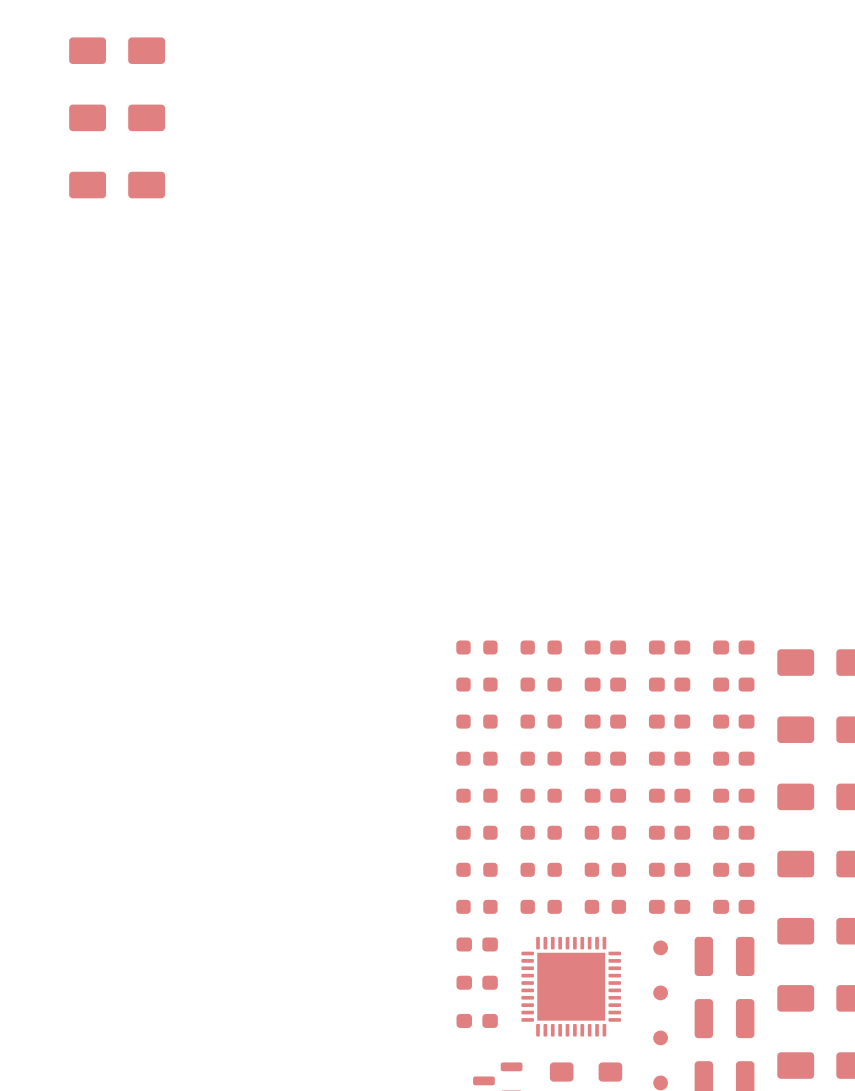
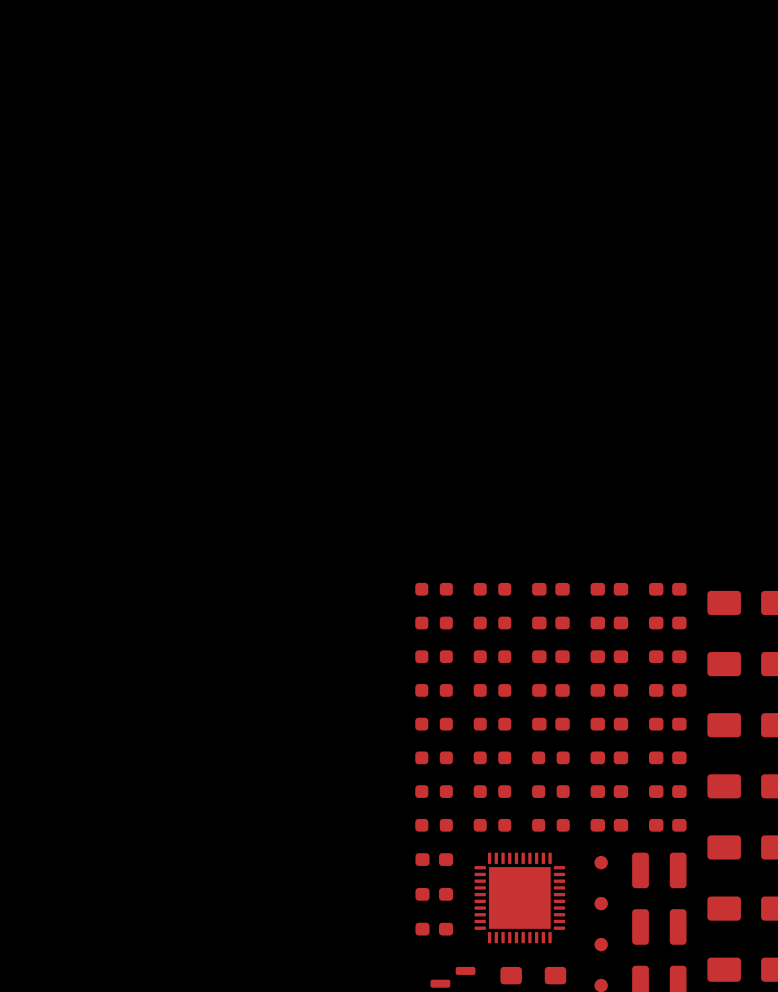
part: (117, 50) -> none
part: (117, 117) -> none
part: (117, 185) -> none

